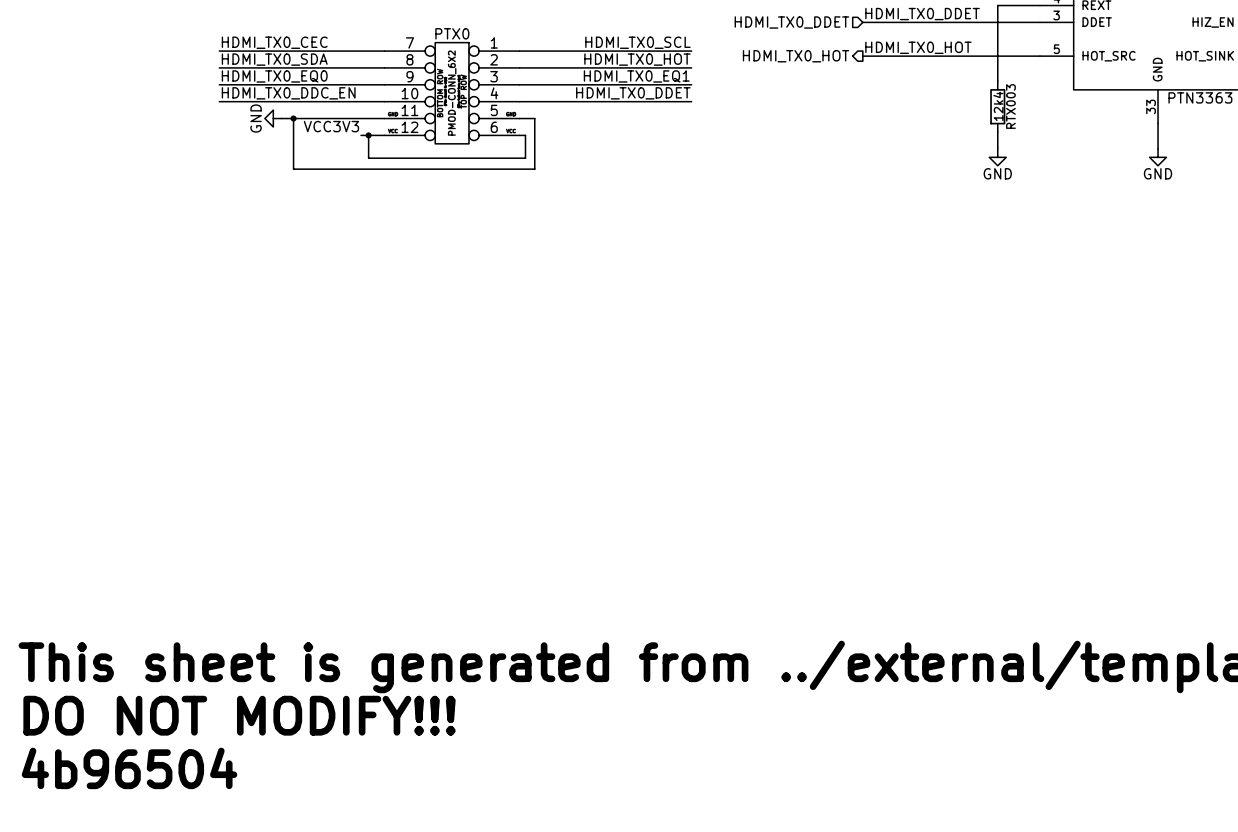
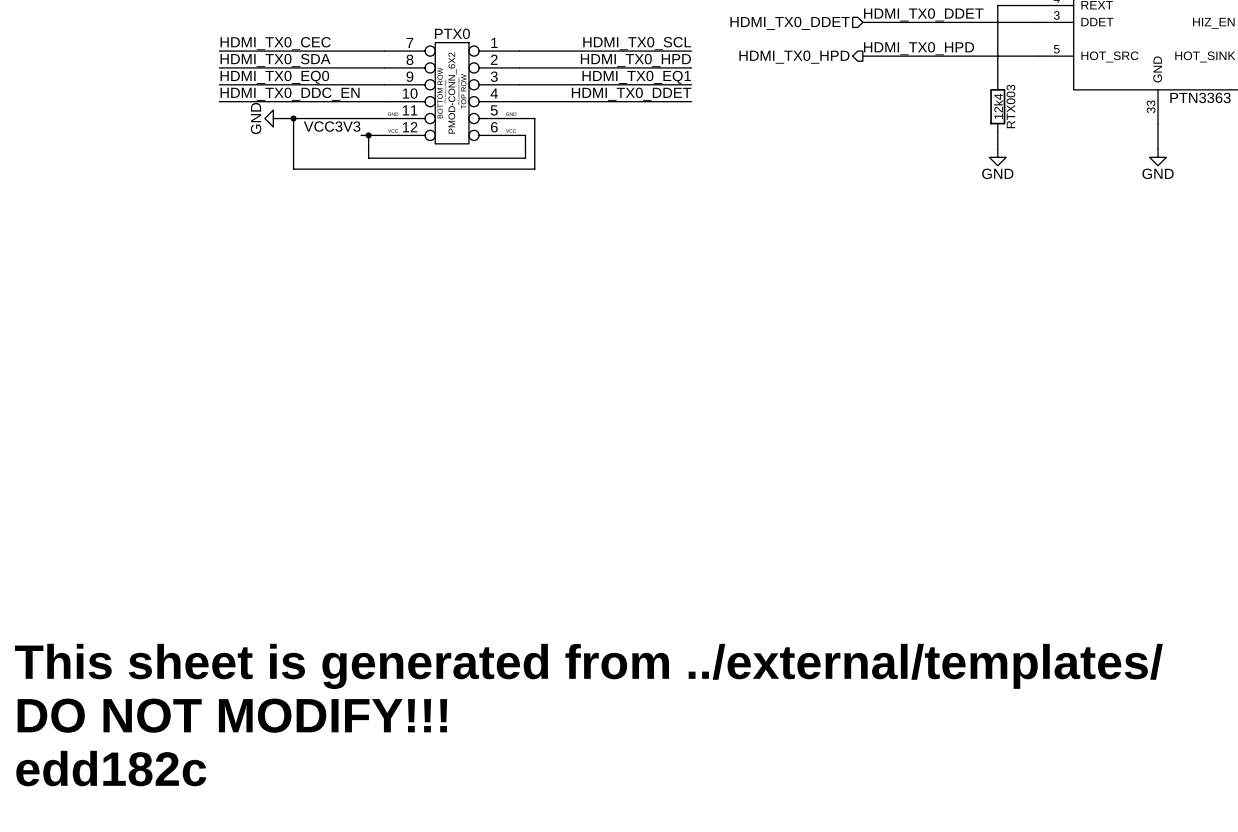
label: HDMI_TX0_HOT (918, 47) -> HDMI_TX0_HPD (919, 48)
hierarchical label: HDMI_TX0_HOT (796, 56) -> HDMI_TX0_HPD (794, 57)
label: HDMI_TX0_HOT (637, 59) -> HDMI_TX0_HPD (635, 60)
text: 4b96504 (129, 768) -> edd182c (111, 768)

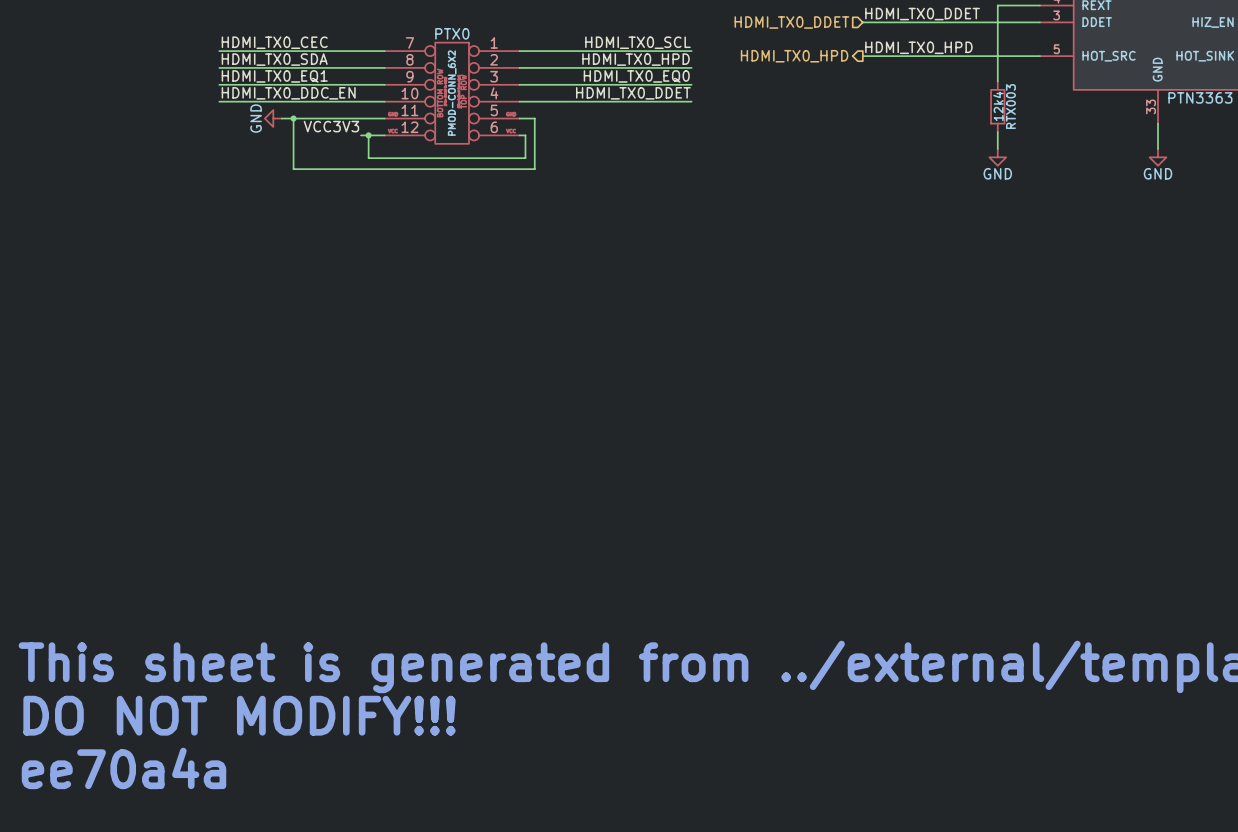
label: HDMI_TX0_EQ0 (274, 77) -> HDMI_TX0_EQ1 (274, 76)
label: HDMI_TX0_EQ1 (636, 77) -> HDMI_TX0_EQ0 (636, 76)
text: edd182c (111, 768) -> ee70a4a (124, 768)

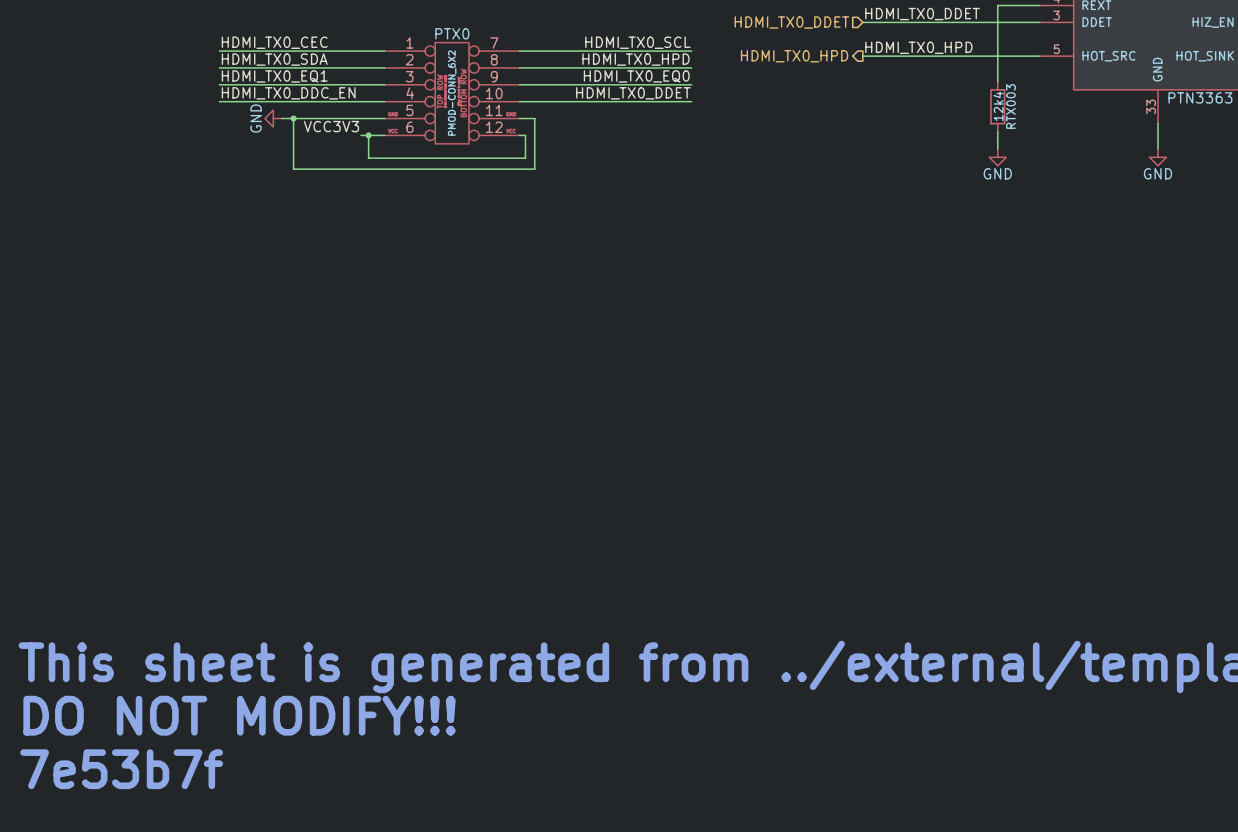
PTX0 flip: as is (452, 93) -> left-right (452, 93)
text: ee70a4a (124, 768) -> 7e53b7f (121, 769)

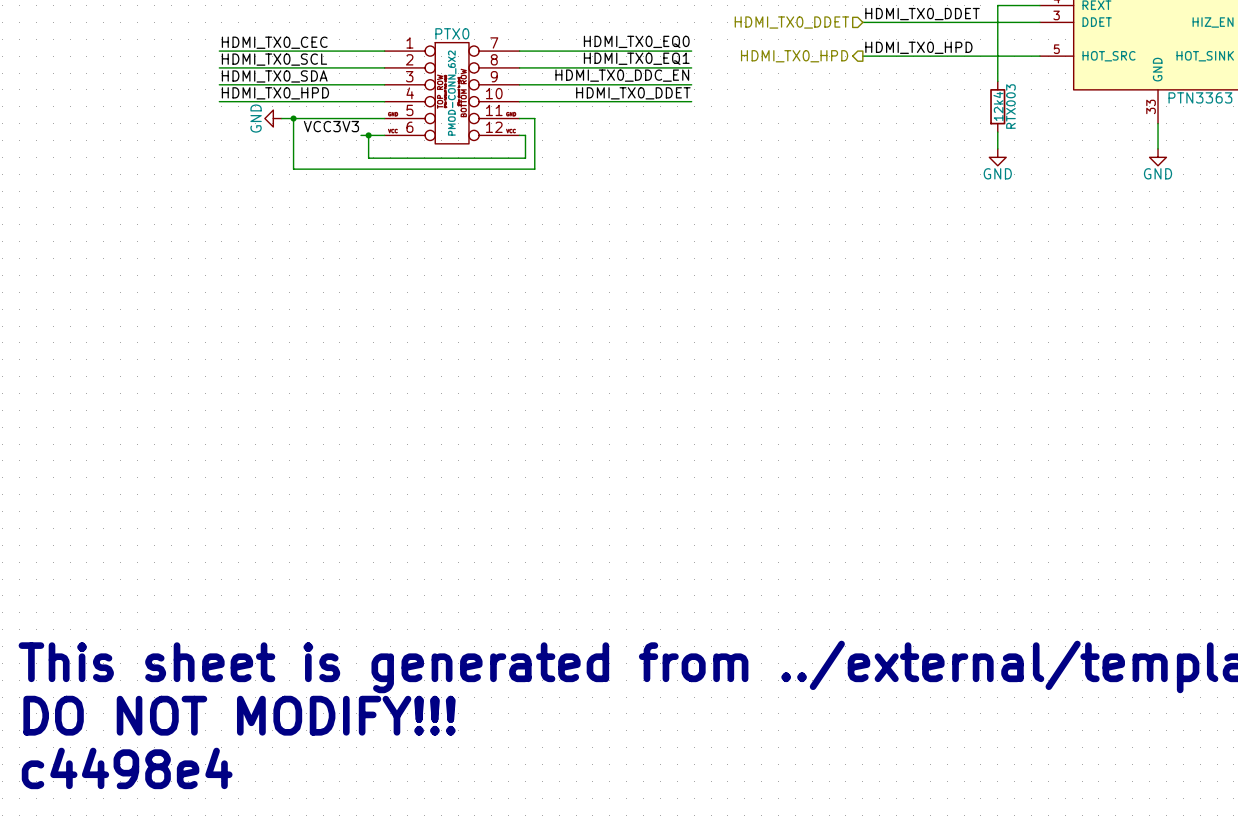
label: HDMI_TX0_SCL (637, 42) -> HDMI_TX0_EQ0 (636, 41)
label: HDMI_TX0_SDA (274, 59) -> HDMI_TX0_SCL (274, 59)
label: HDMI_TX0_HPD (636, 59) -> HDMI_TX0_EQ1 (636, 58)
label: HDMI_TX0_EQ1 (274, 76) -> HDMI_TX0_SDA (274, 76)
label: HDMI_TX0_EQ0 (636, 76) -> HDMI_TX0_DDC_EN (622, 75)
label: HDMI_TX0_DDC_EN (288, 93) -> HDMI_TX0_HPD (275, 93)
text: 7e53b7f (121, 769) -> c4498e4 (127, 768)

